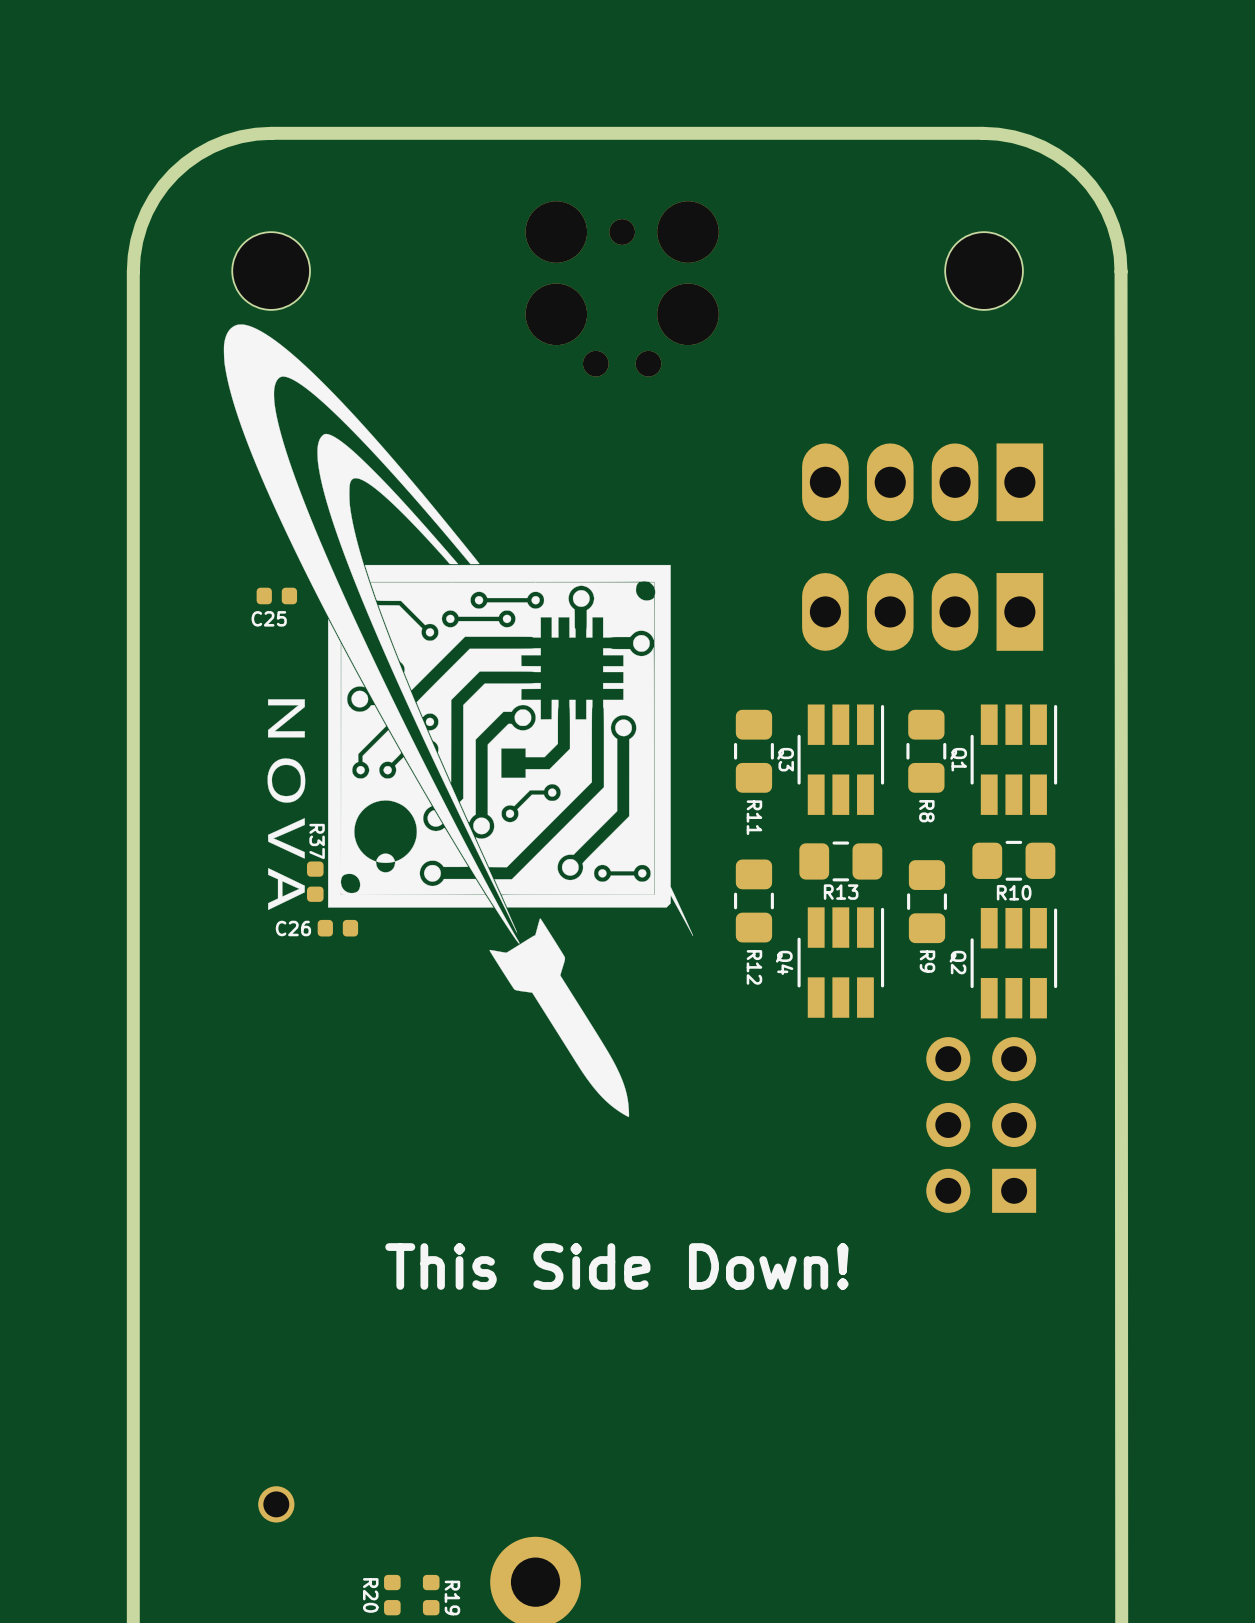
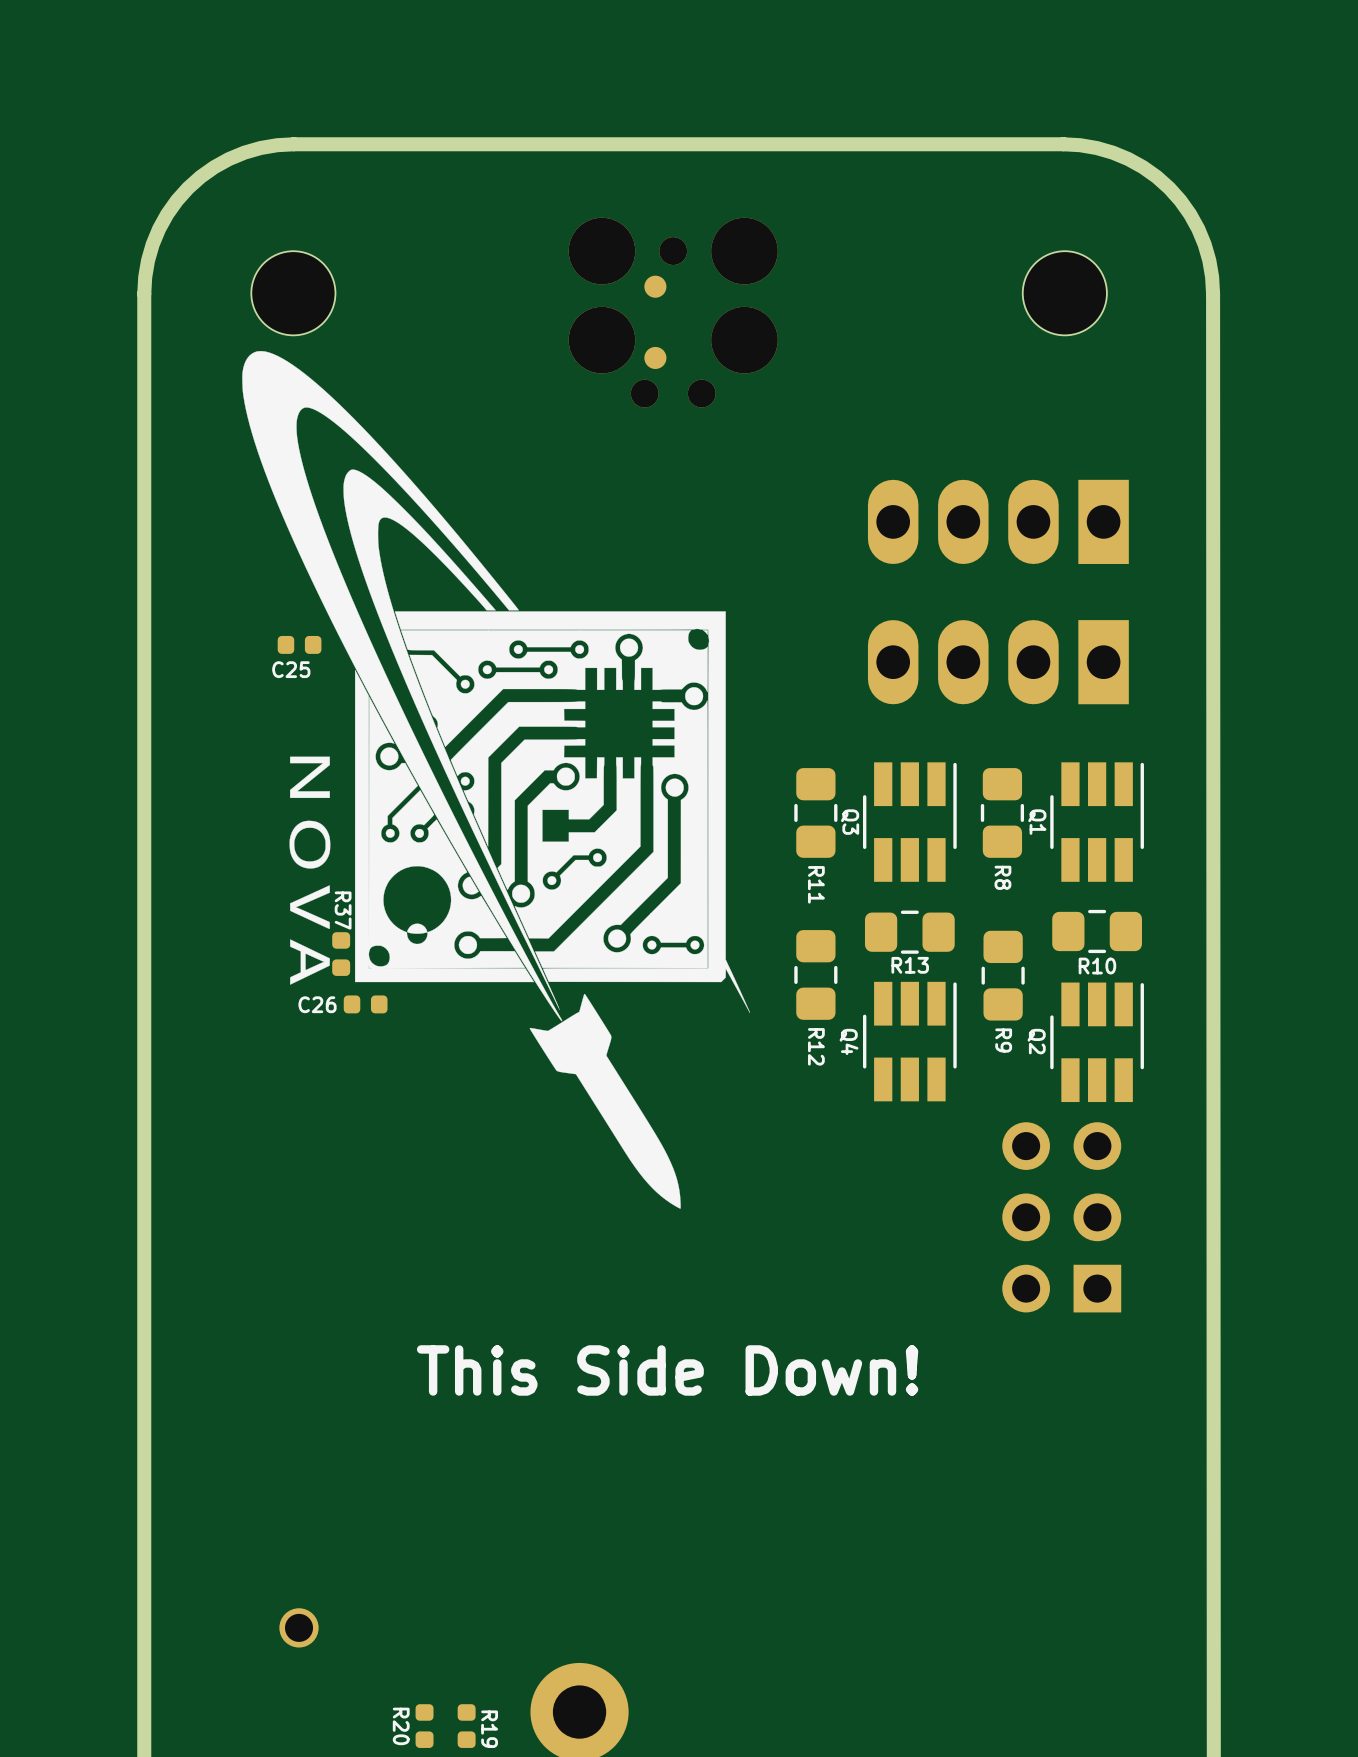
part footprint: [525, 201, 719, 377] -> [568, 217, 778, 408]

